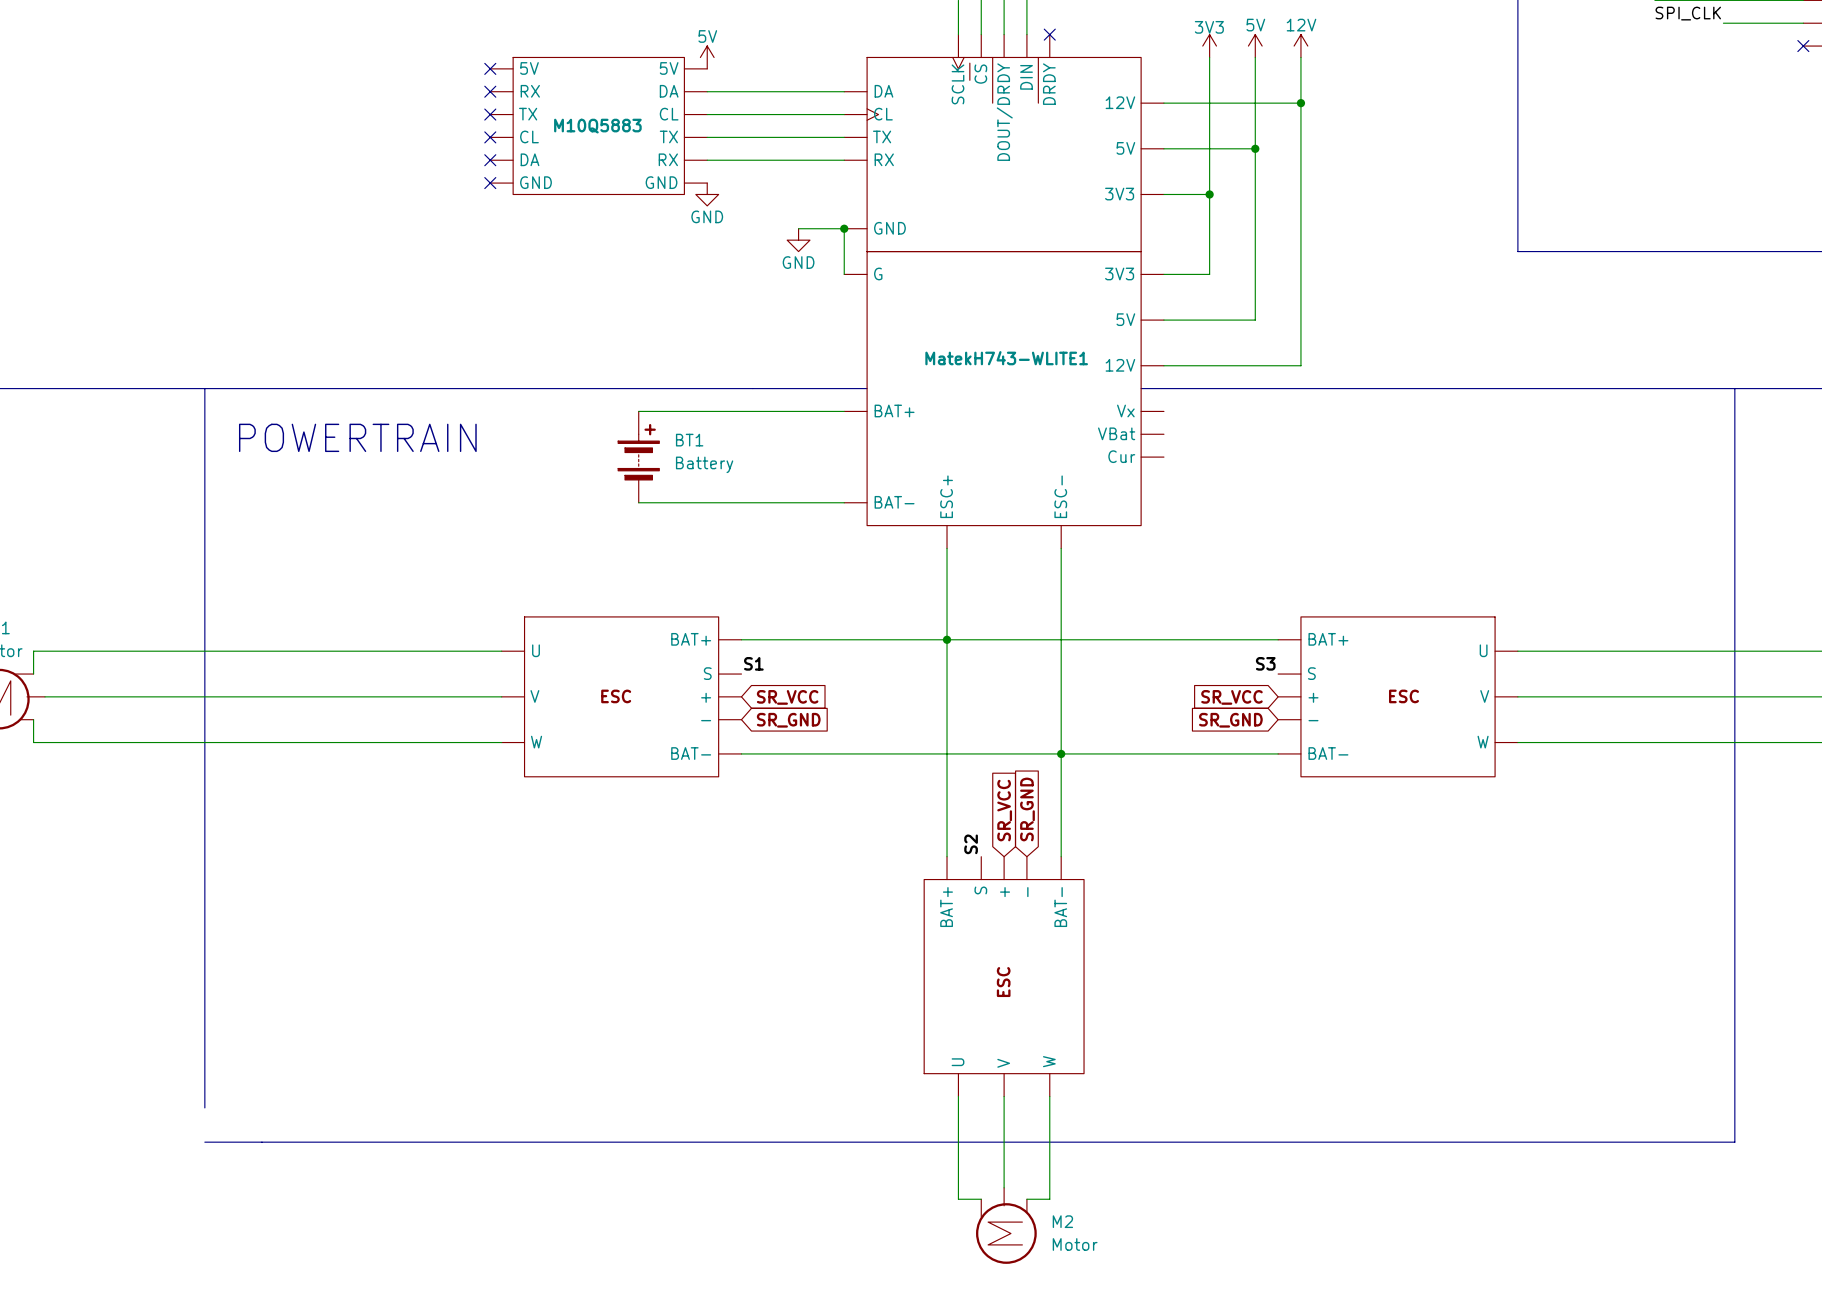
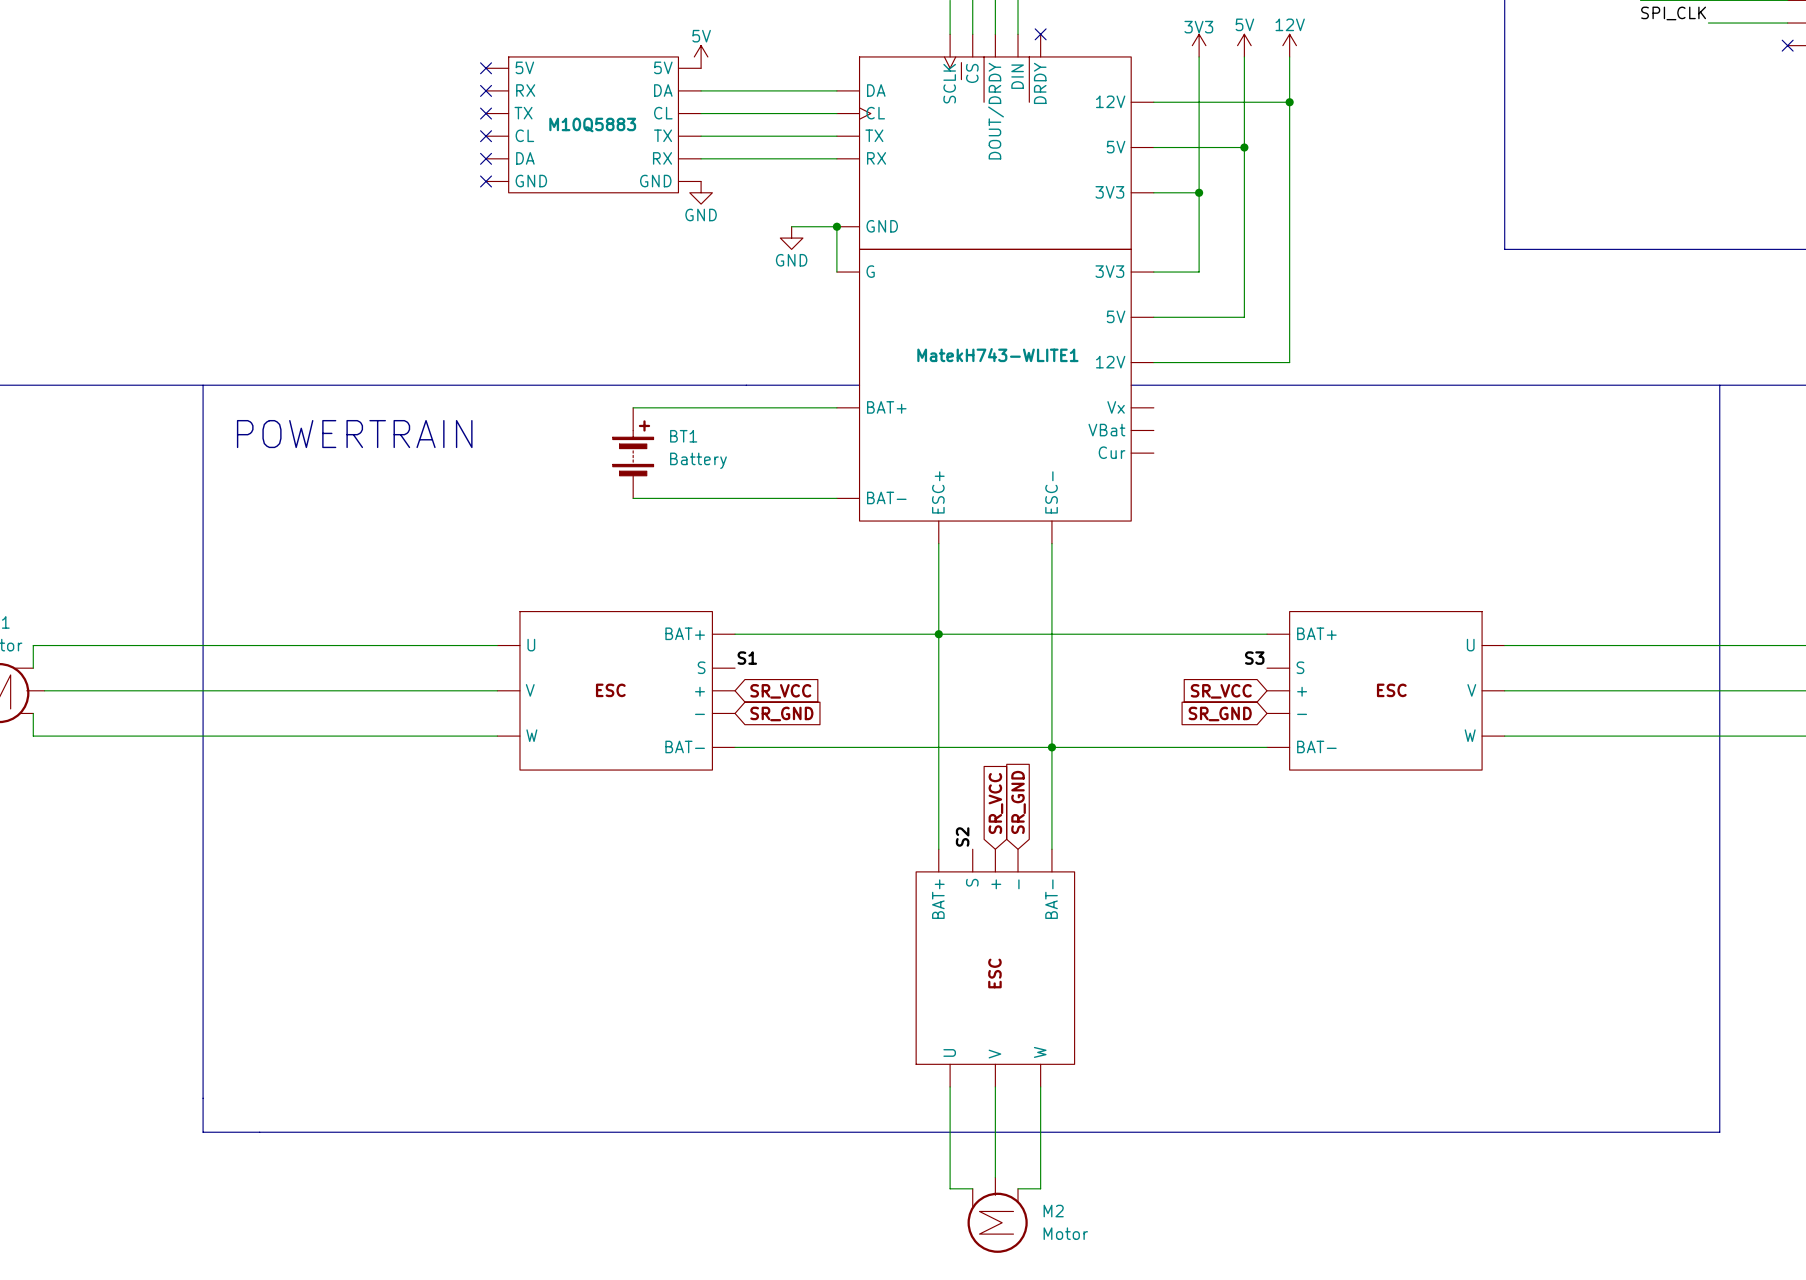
line: none -> (203, 1098) (203, 1132)

